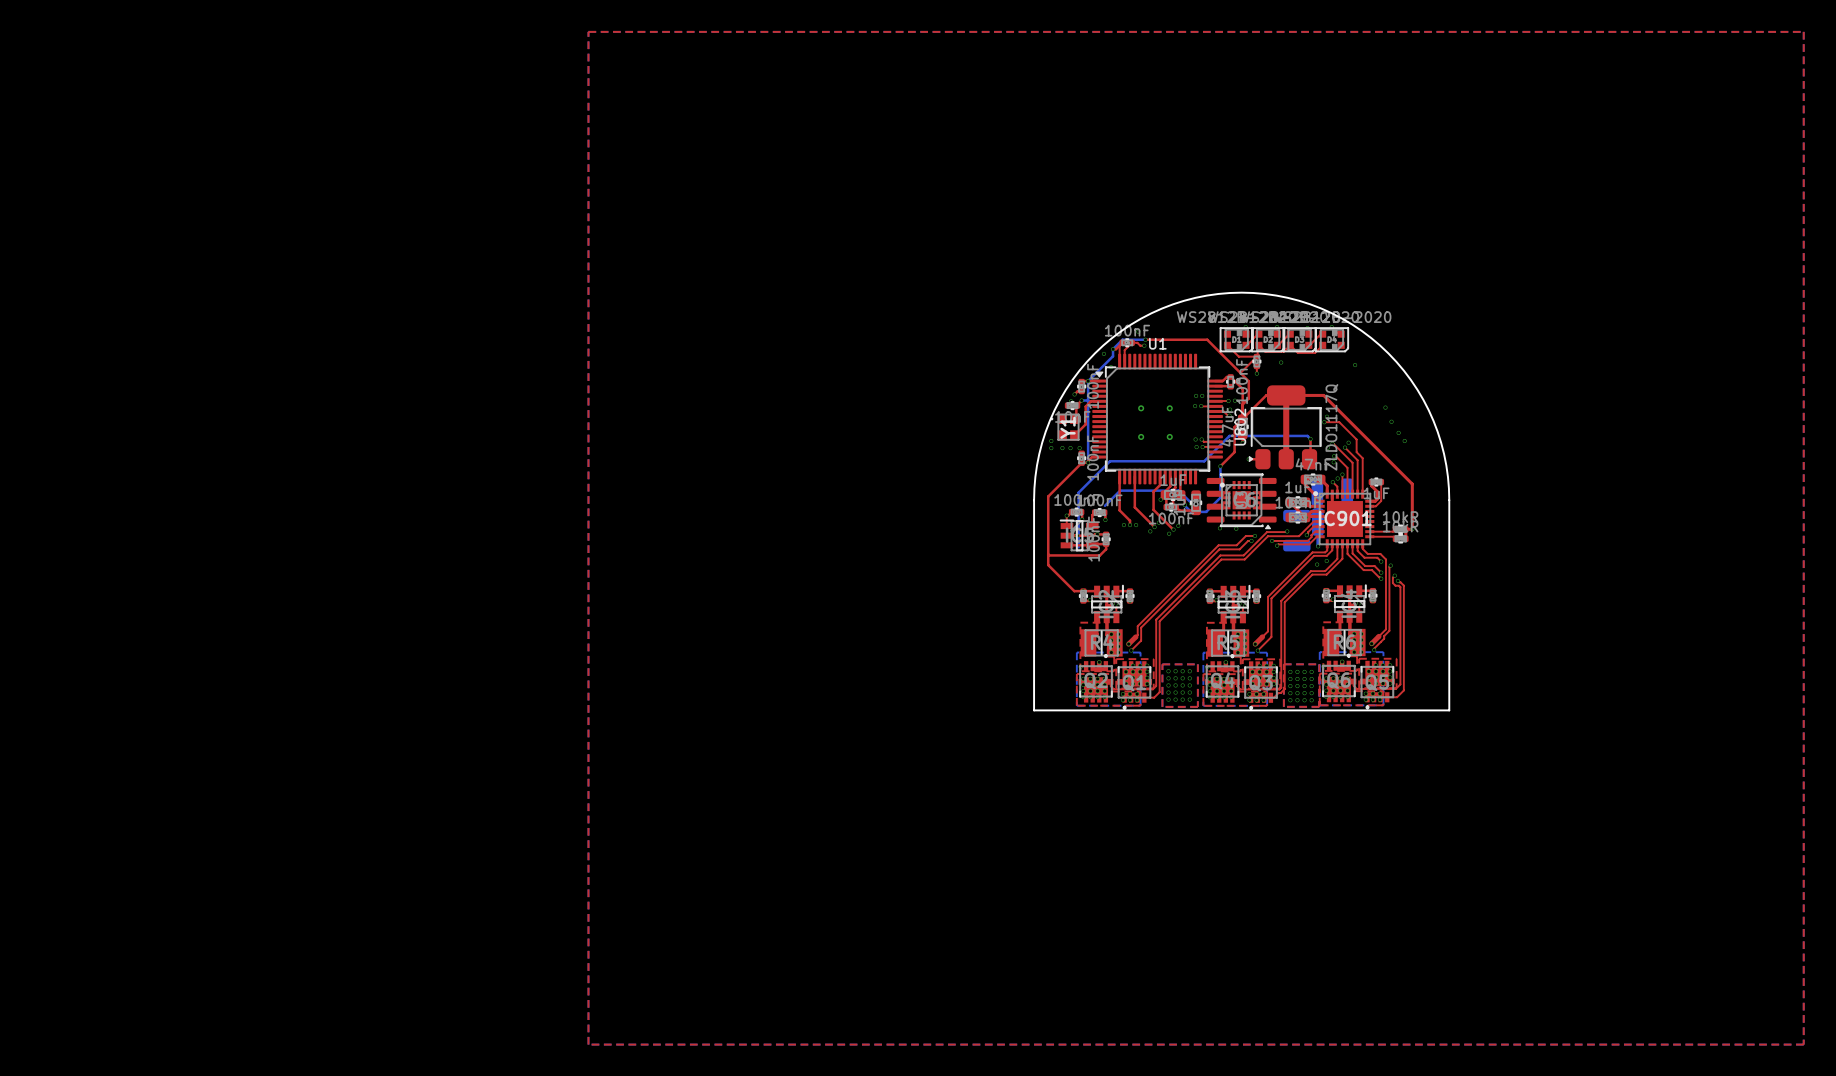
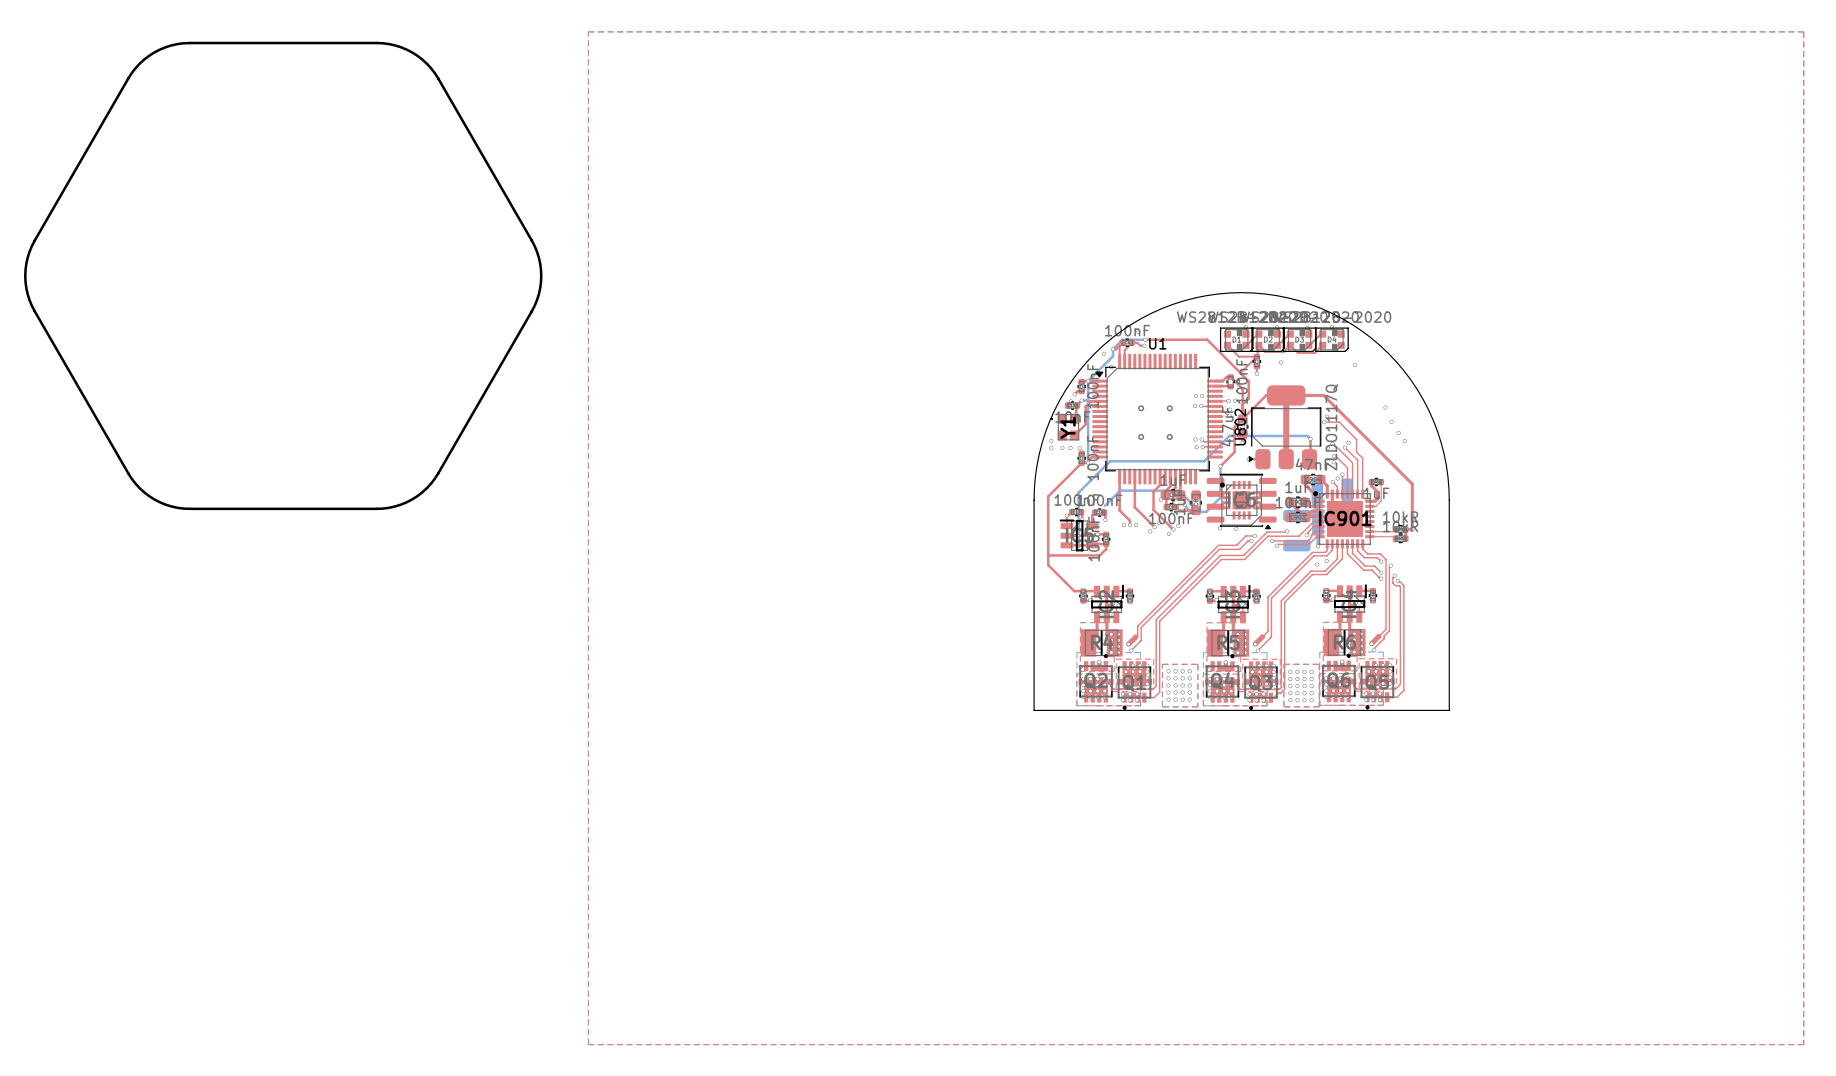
board edge: none -> (189, 43) (376, 43) (395, 45) (412, 52) (426, 63) (438, 78) (534, 245) (538, 257) (541, 275) (540, 288) (534, 305) (434, 478) (422, 492) (406, 502) (389, 507) (376, 508) (189, 508) (171, 506) (154, 499) (139, 488) (128, 473) (31, 305) (27, 294) (25, 275) (26, 263) (31, 245) (128, 78) (139, 63) (154, 52) (171, 45) (189, 43)

